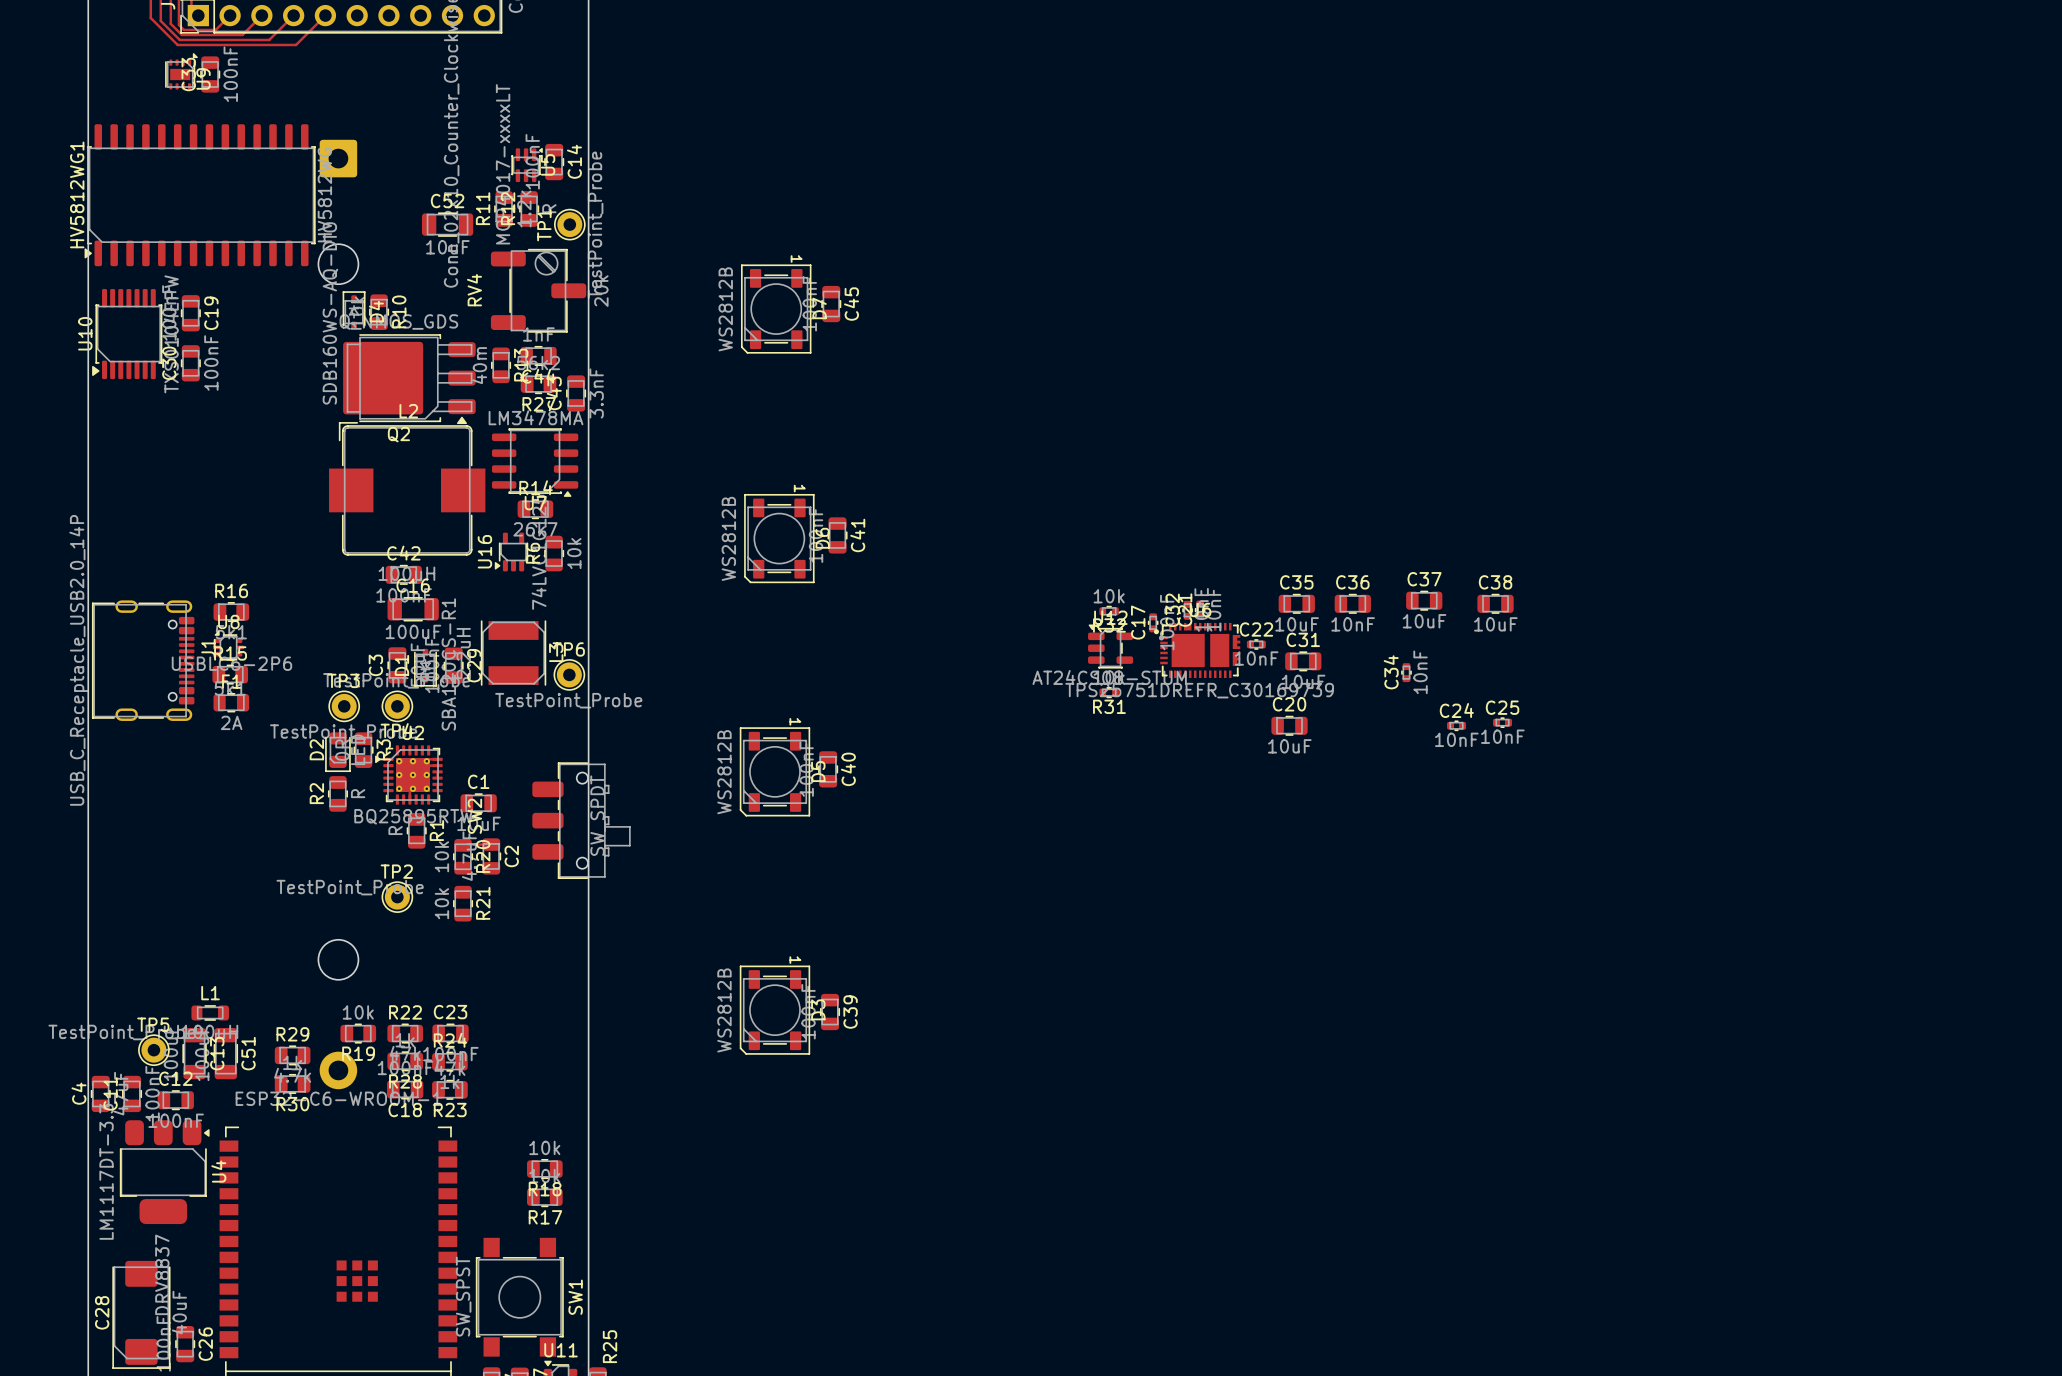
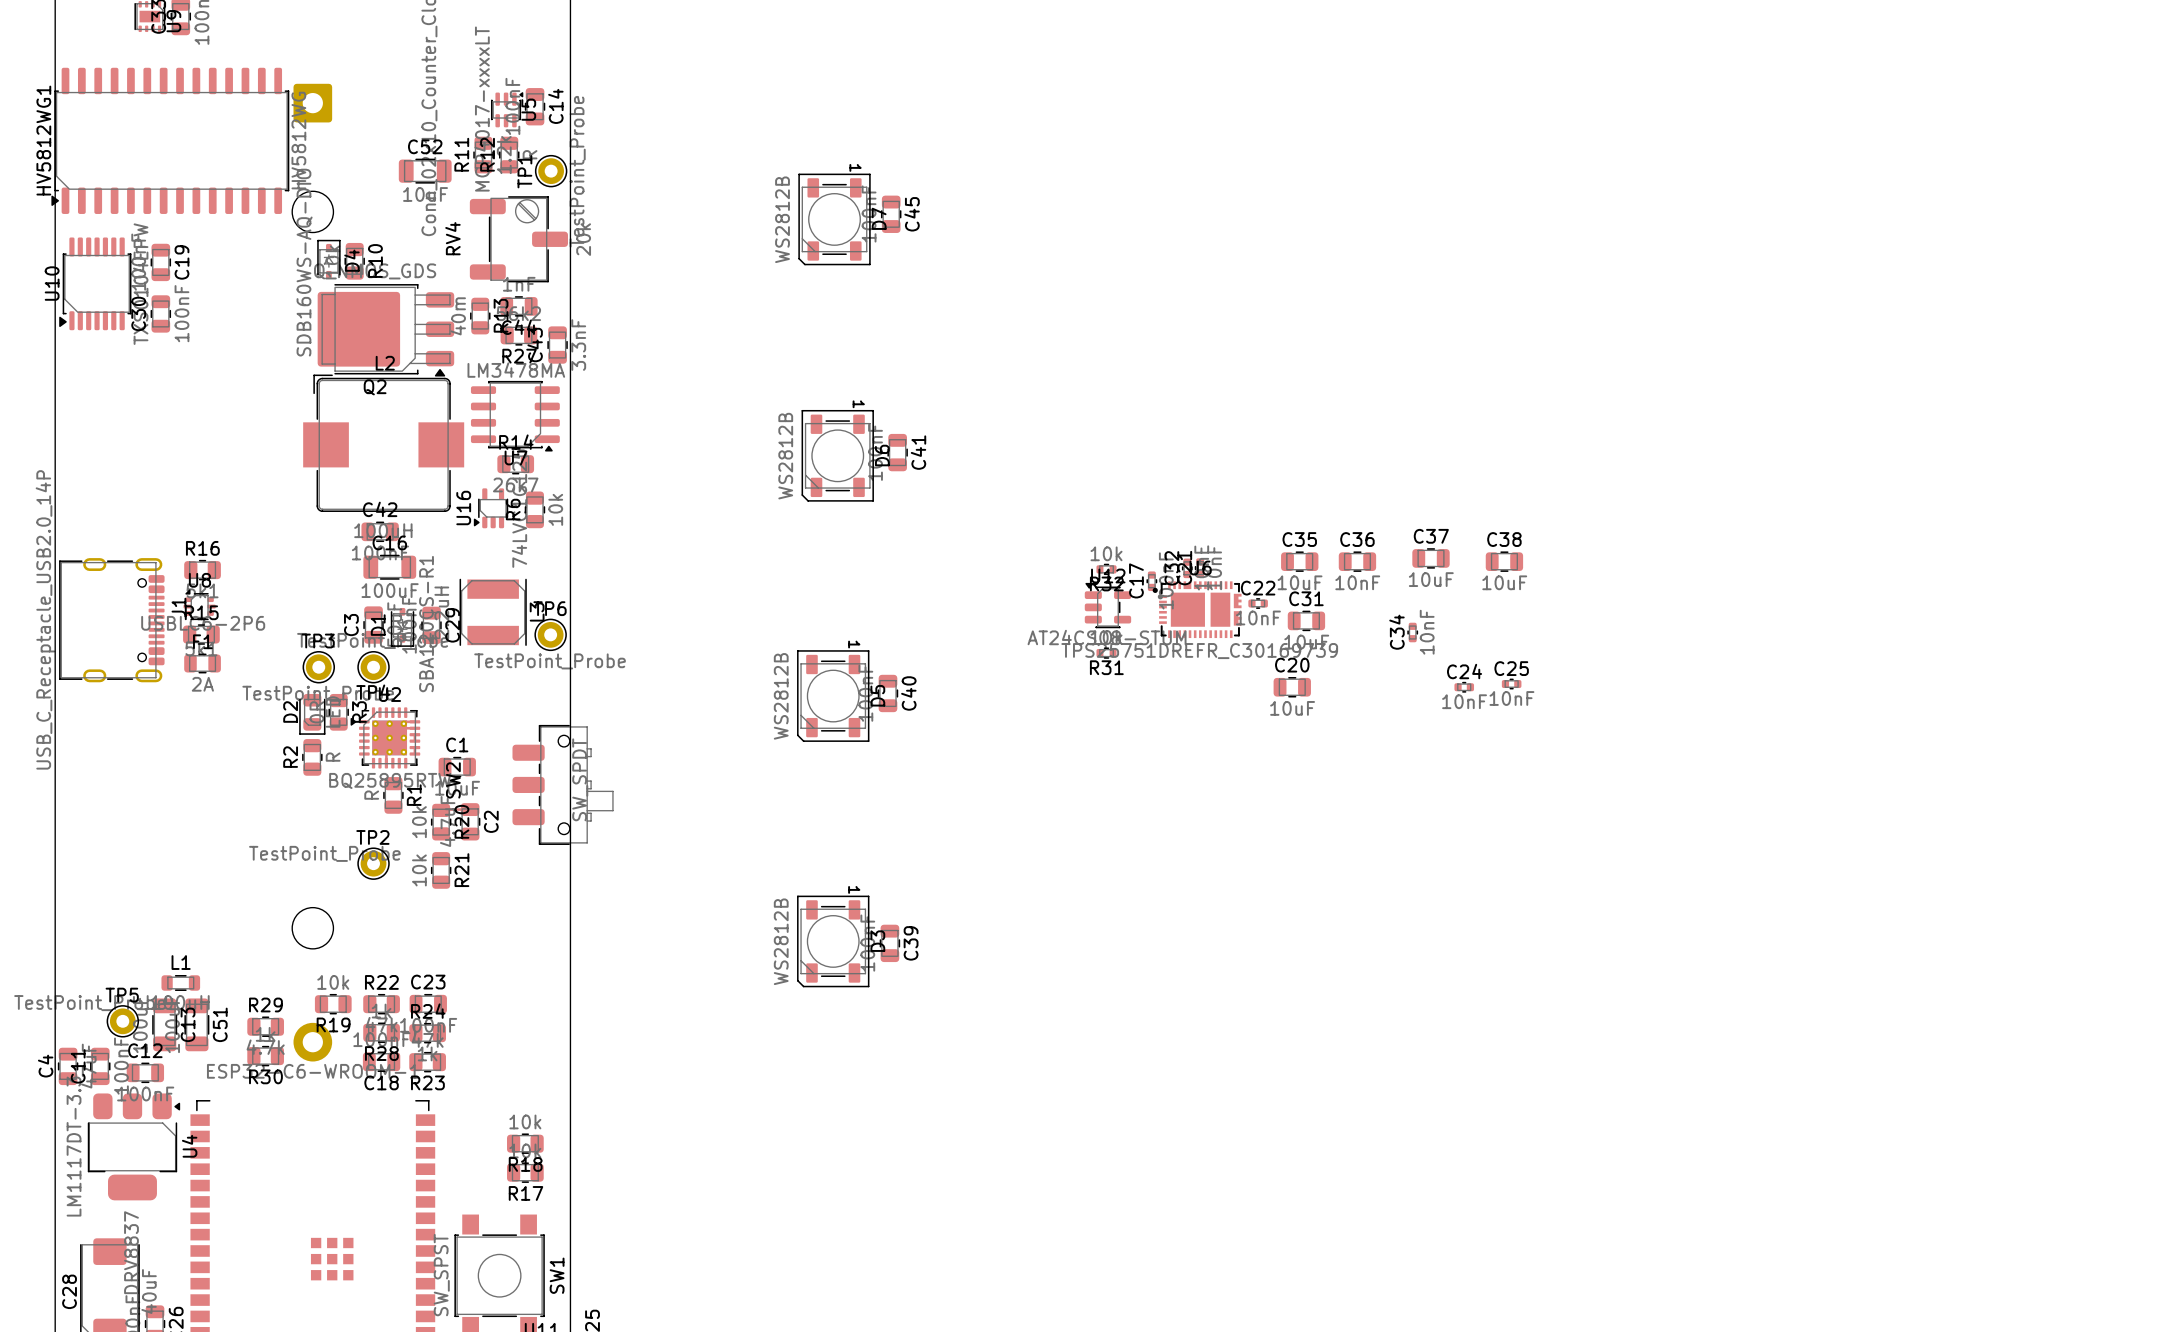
C45 position: (831, 304) -> (891, 214)
D7 position: (776, 309) -> (834, 219)
C41 position: (837, 535) -> (897, 452)
D6 position: (779, 538) -> (837, 455)
C40 position: (828, 769) -> (887, 693)
D5 position: (774, 771) -> (833, 696)
D3 position: (774, 1010) -> (833, 941)
C39 position: (830, 1012) -> (889, 943)

